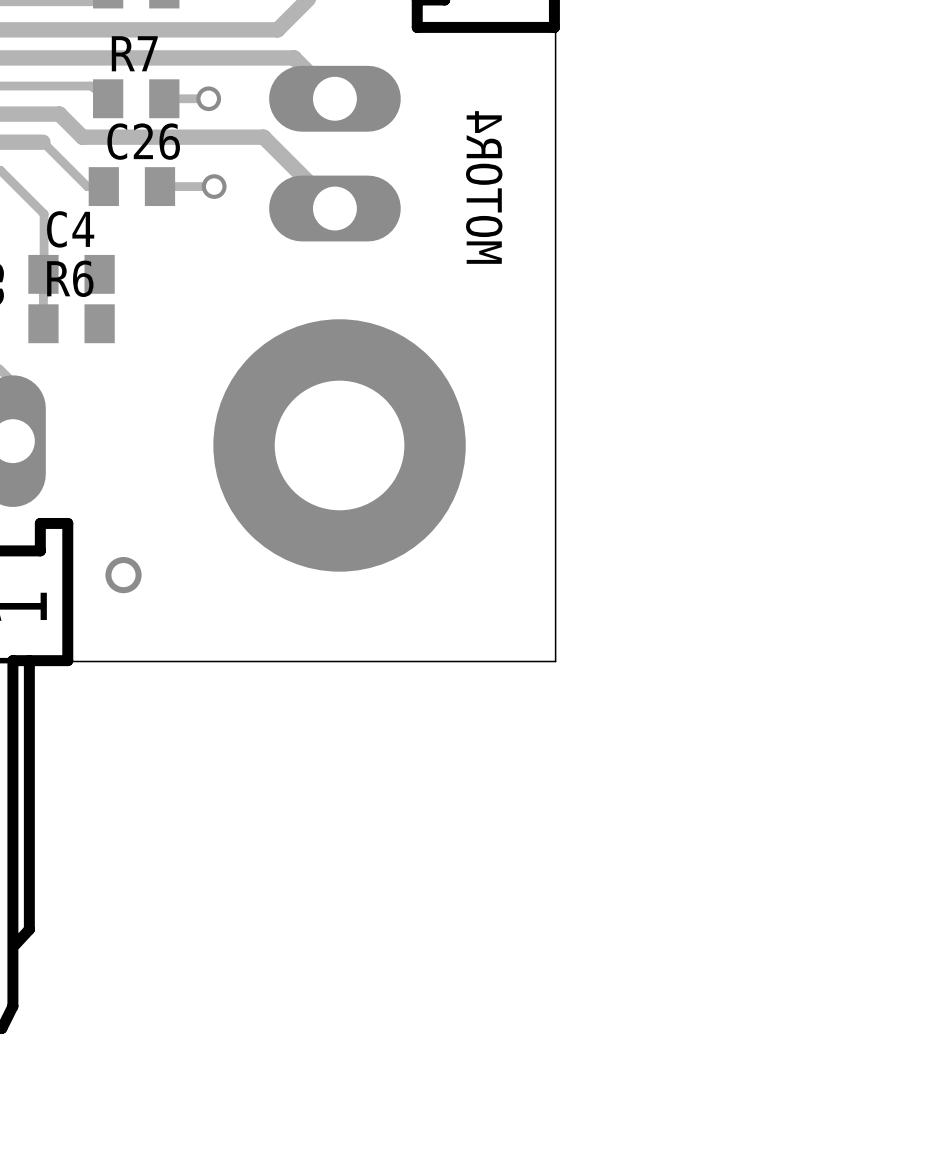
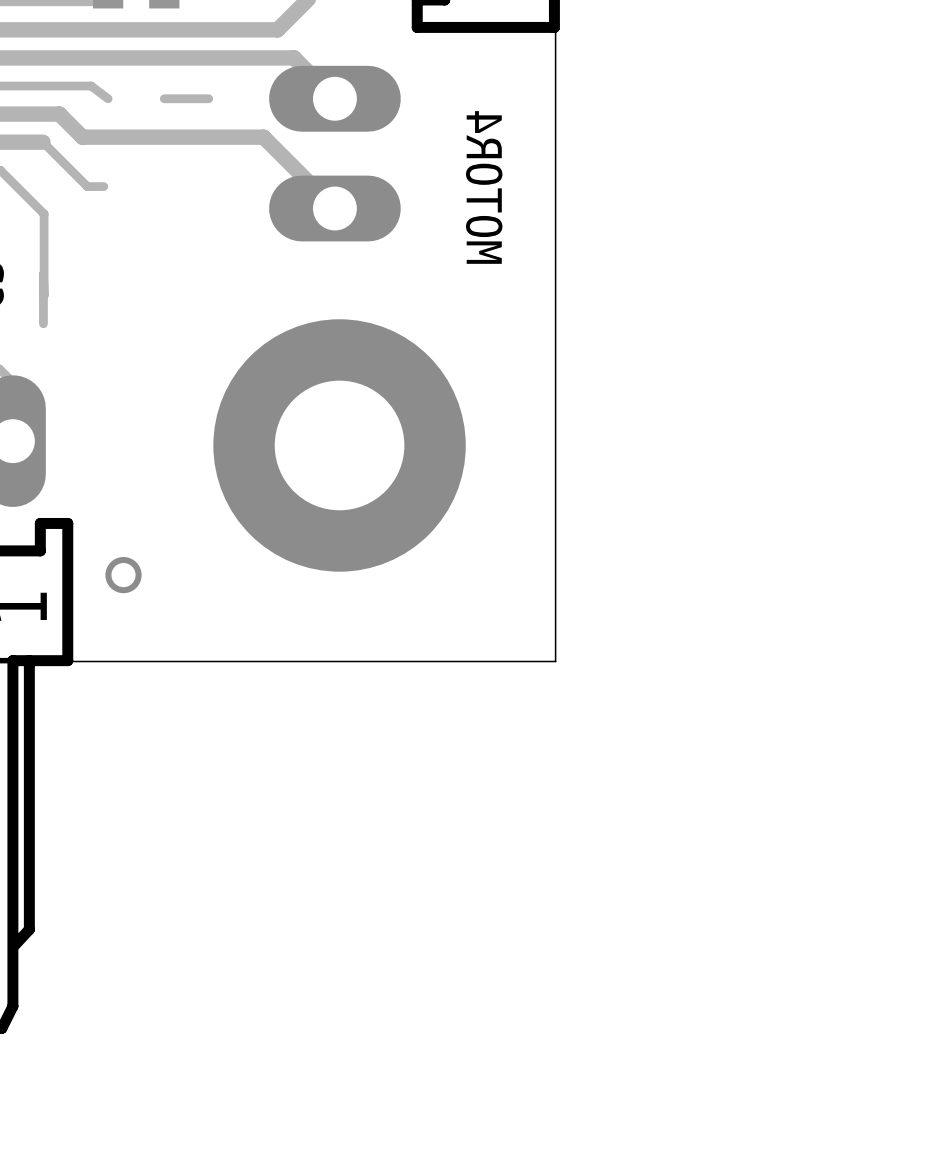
R7: (136, 98) -> none
via: (208, 98) -> none
C26: (131, 186) -> none
track: (214, 186) (159, 186) -> none
via: (214, 186) -> none
C4: (71, 274) -> none
R6: (71, 323) -> none

